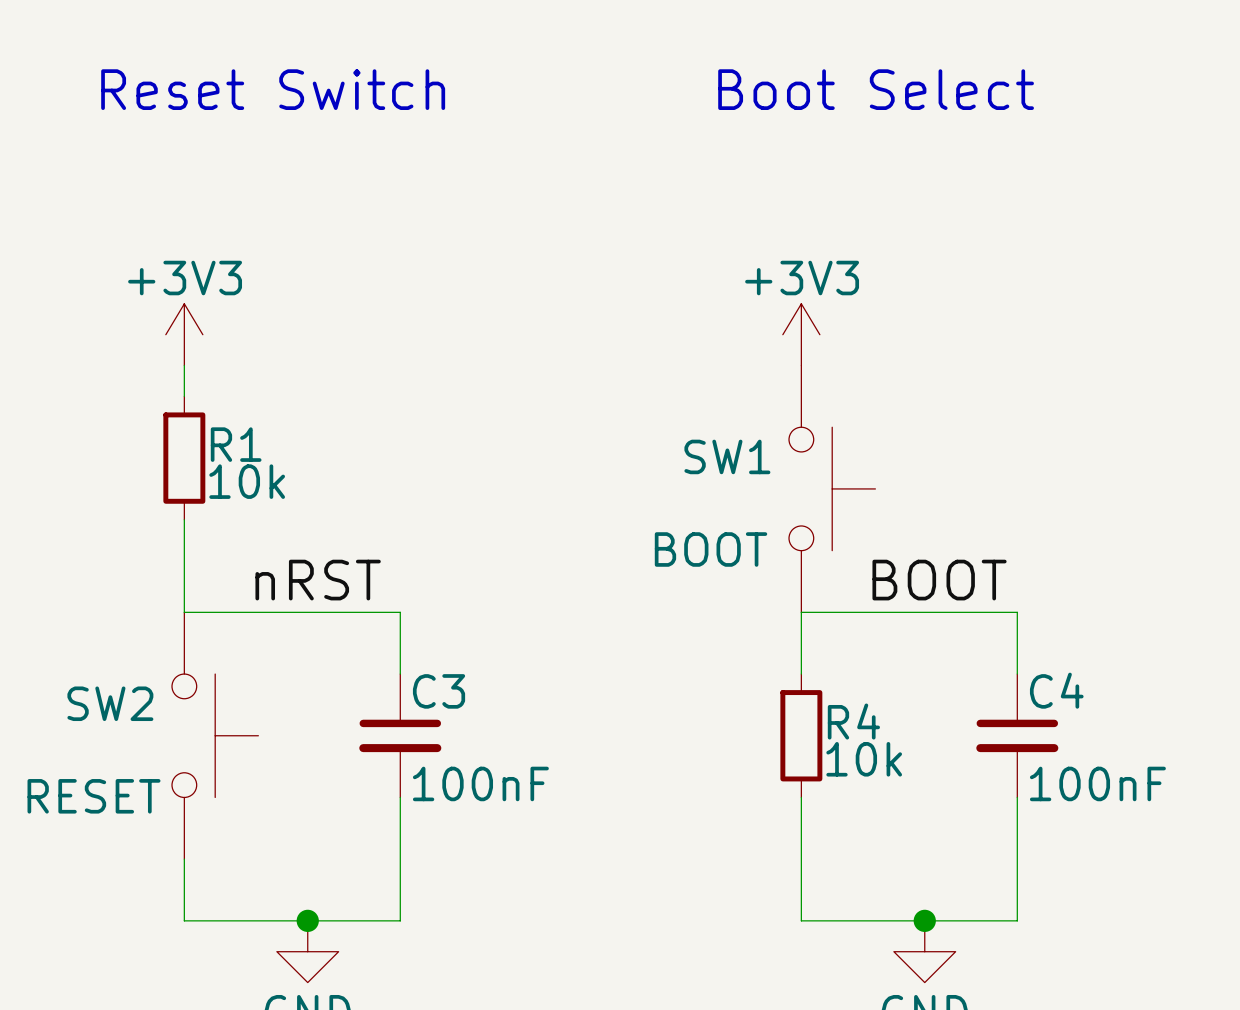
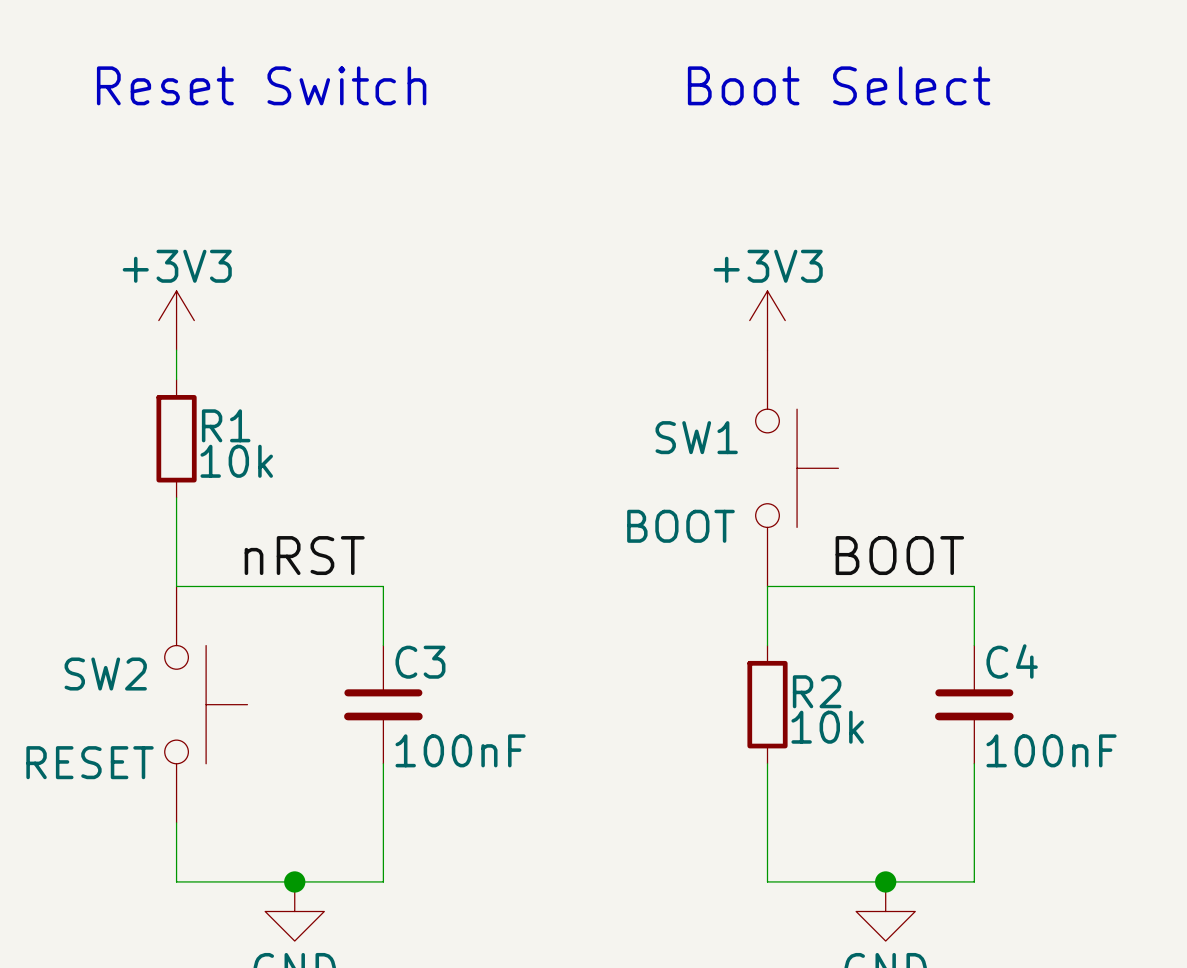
R4 name: R4 (853, 721) -> R2 (817, 691)

